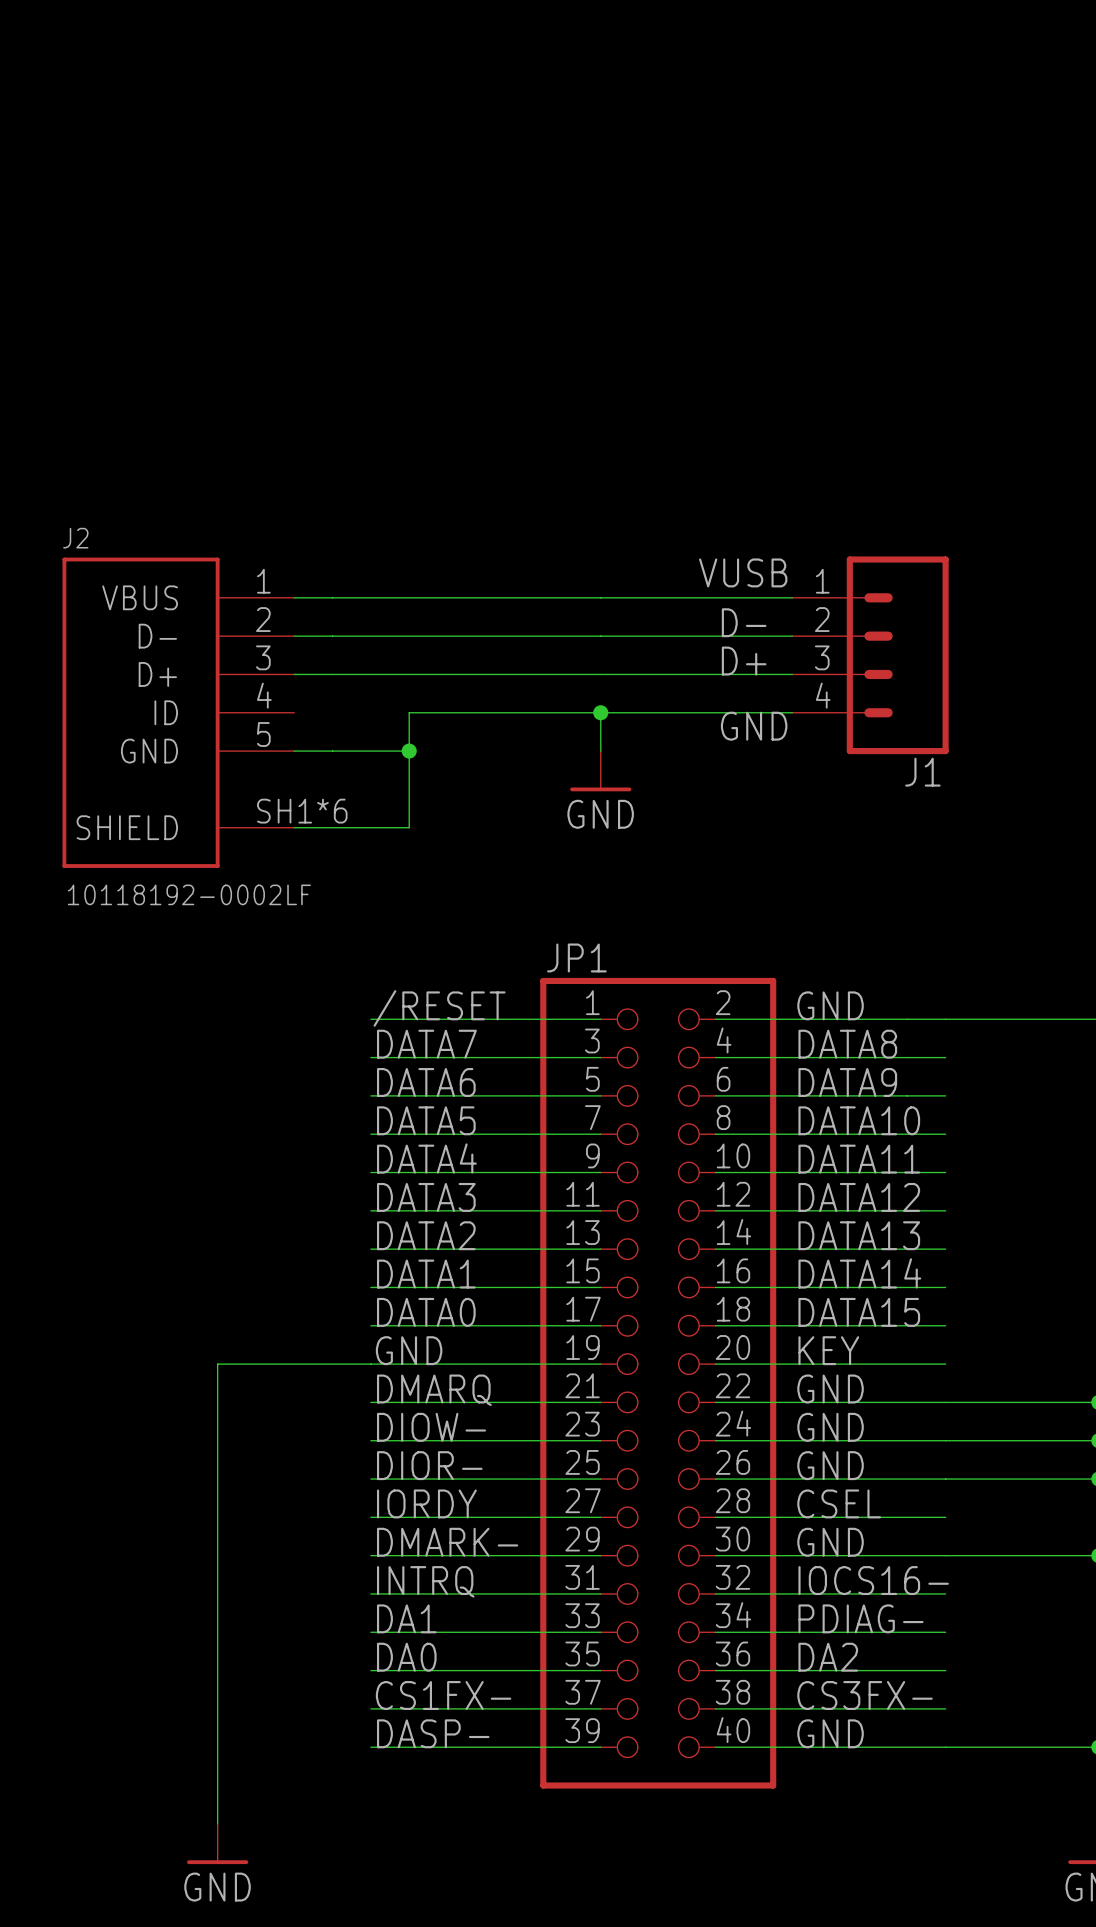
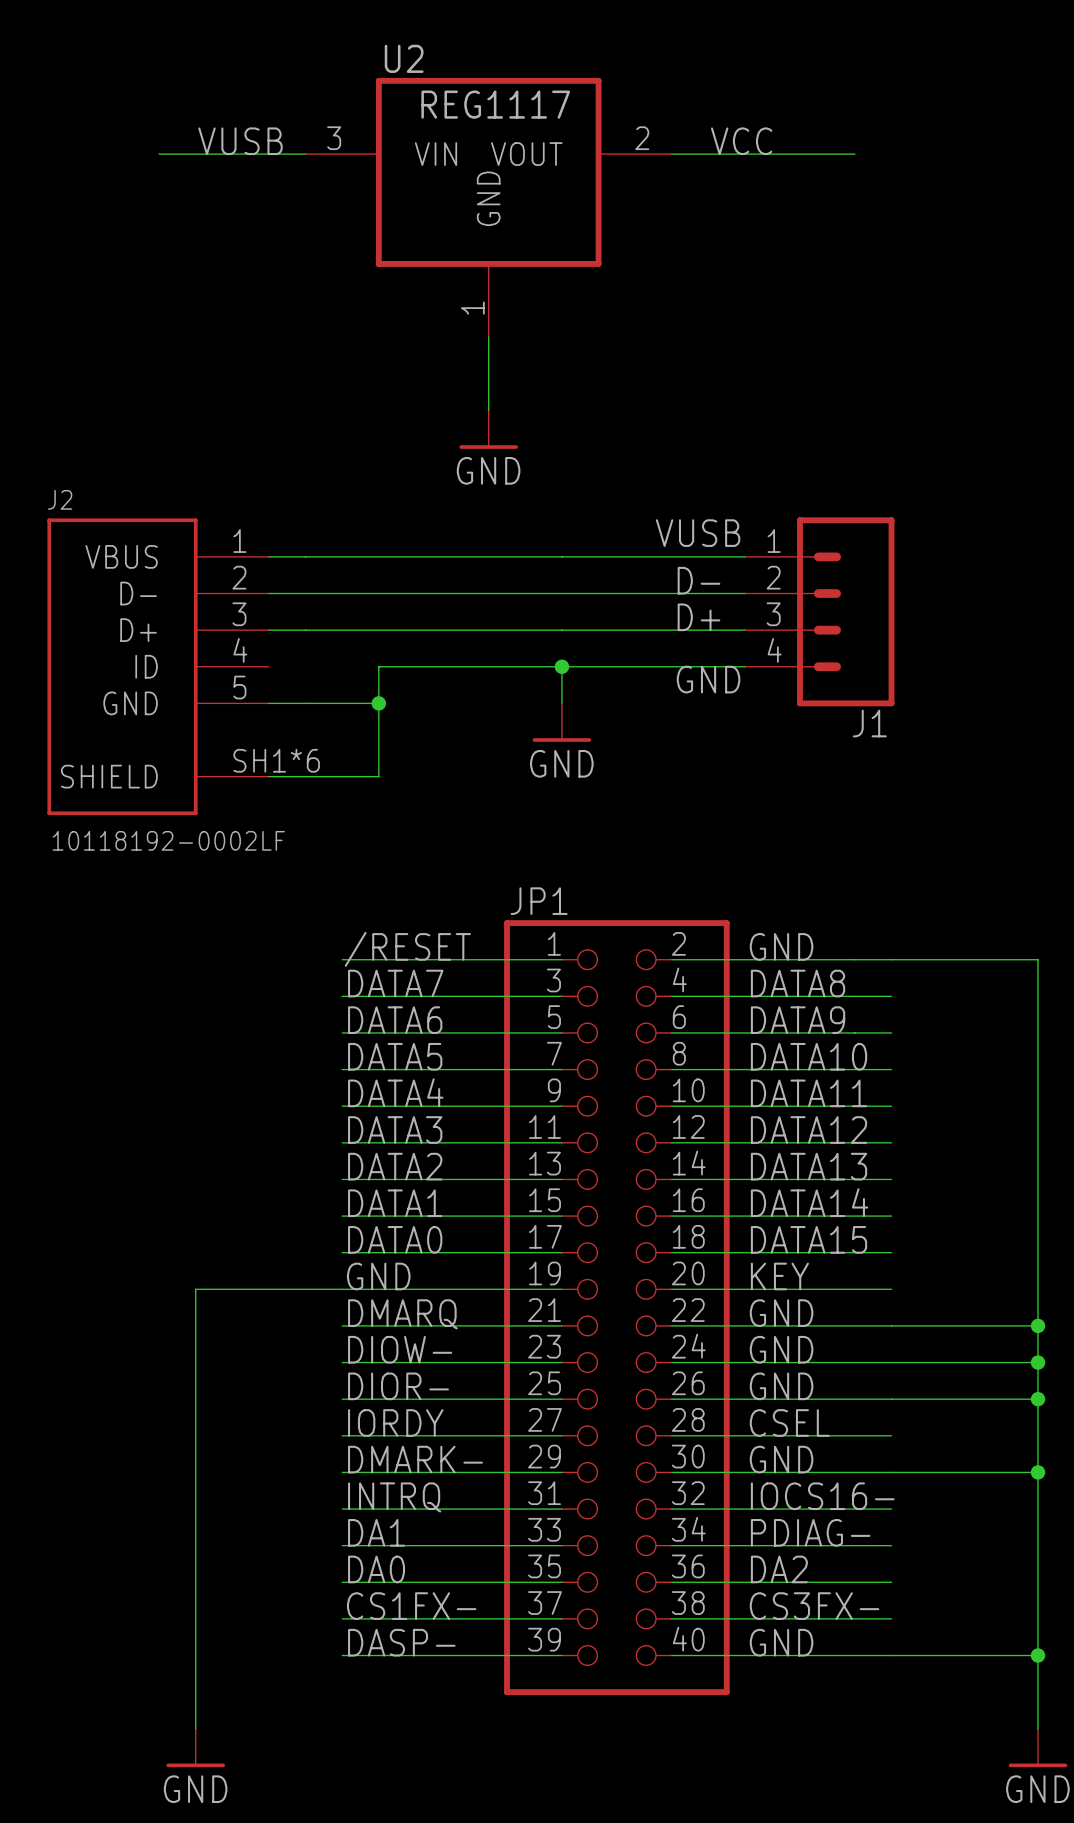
label: none -> VUSB (240, 141)
label: none -> VCC (741, 141)
wire: none -> (159, 154) (305, 154)
wire: none -> (671, 154) (854, 154)
U2: none -> REG1117 (488, 207)
wire: none -> (488, 337) (488, 410)
power symbol: none -> GND (488, 429)

